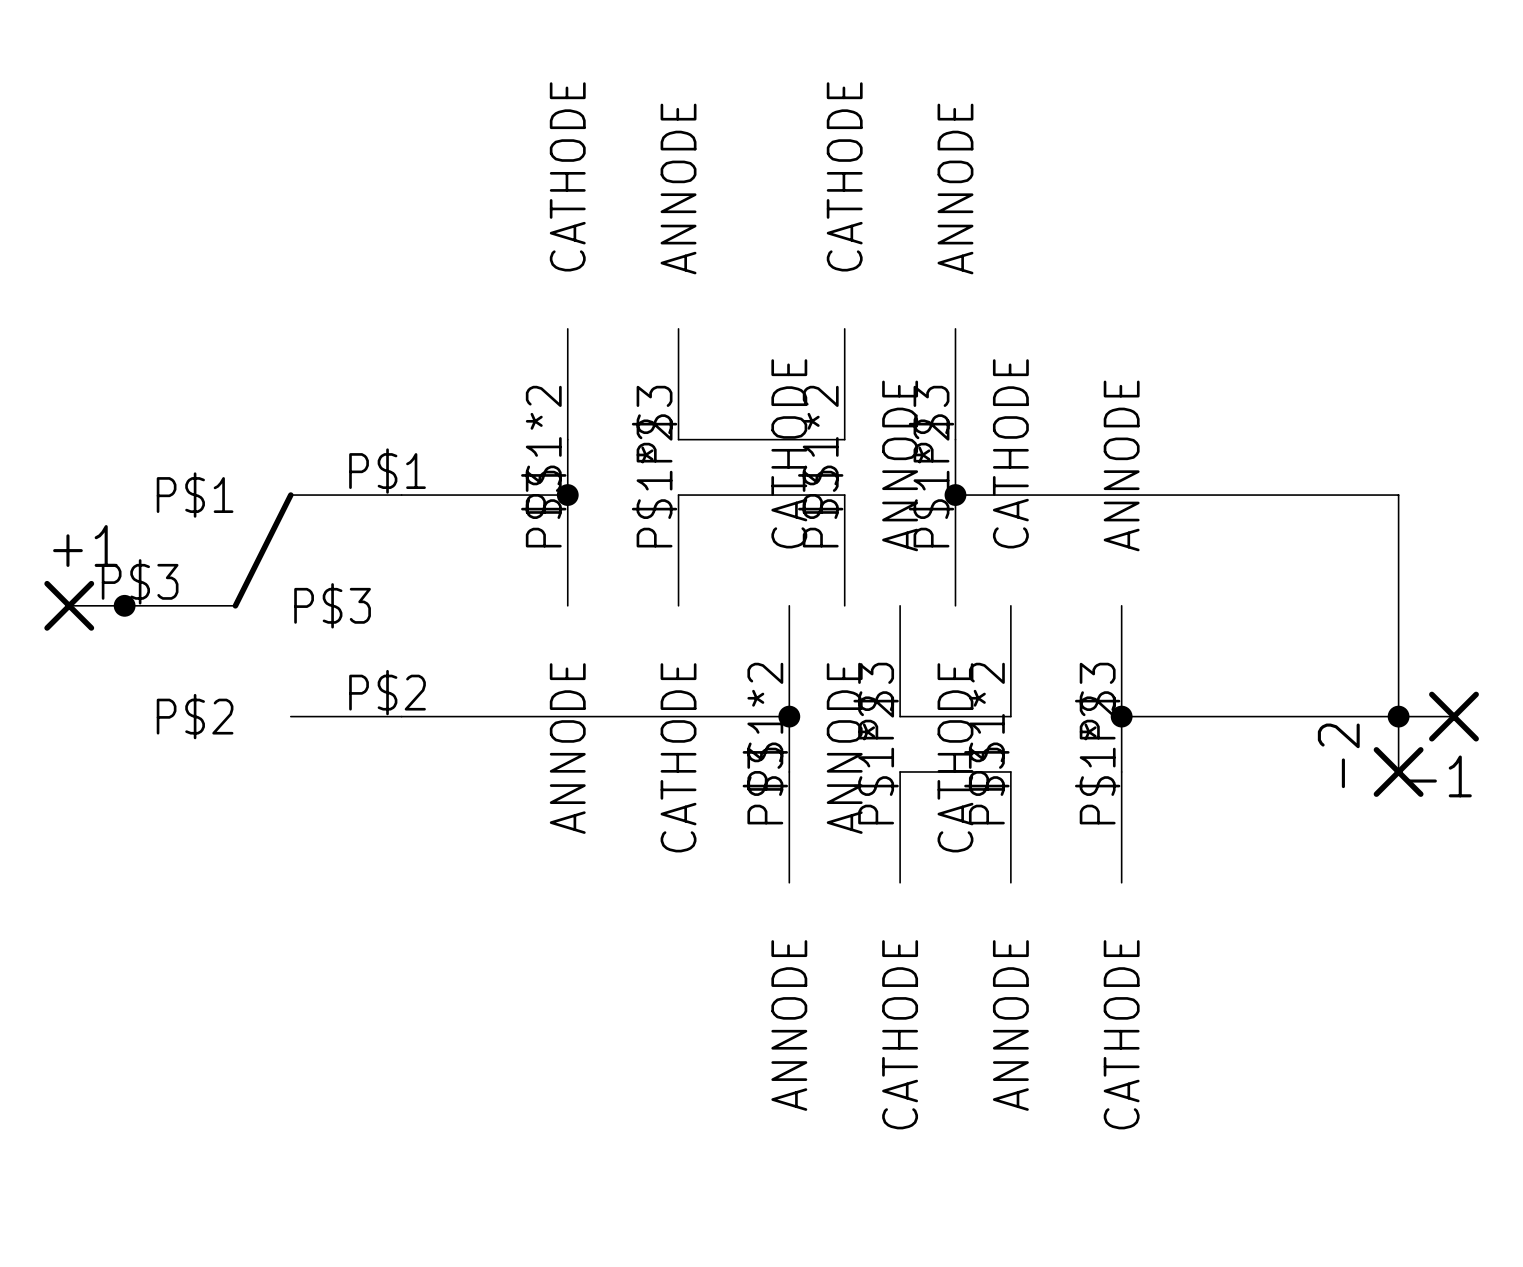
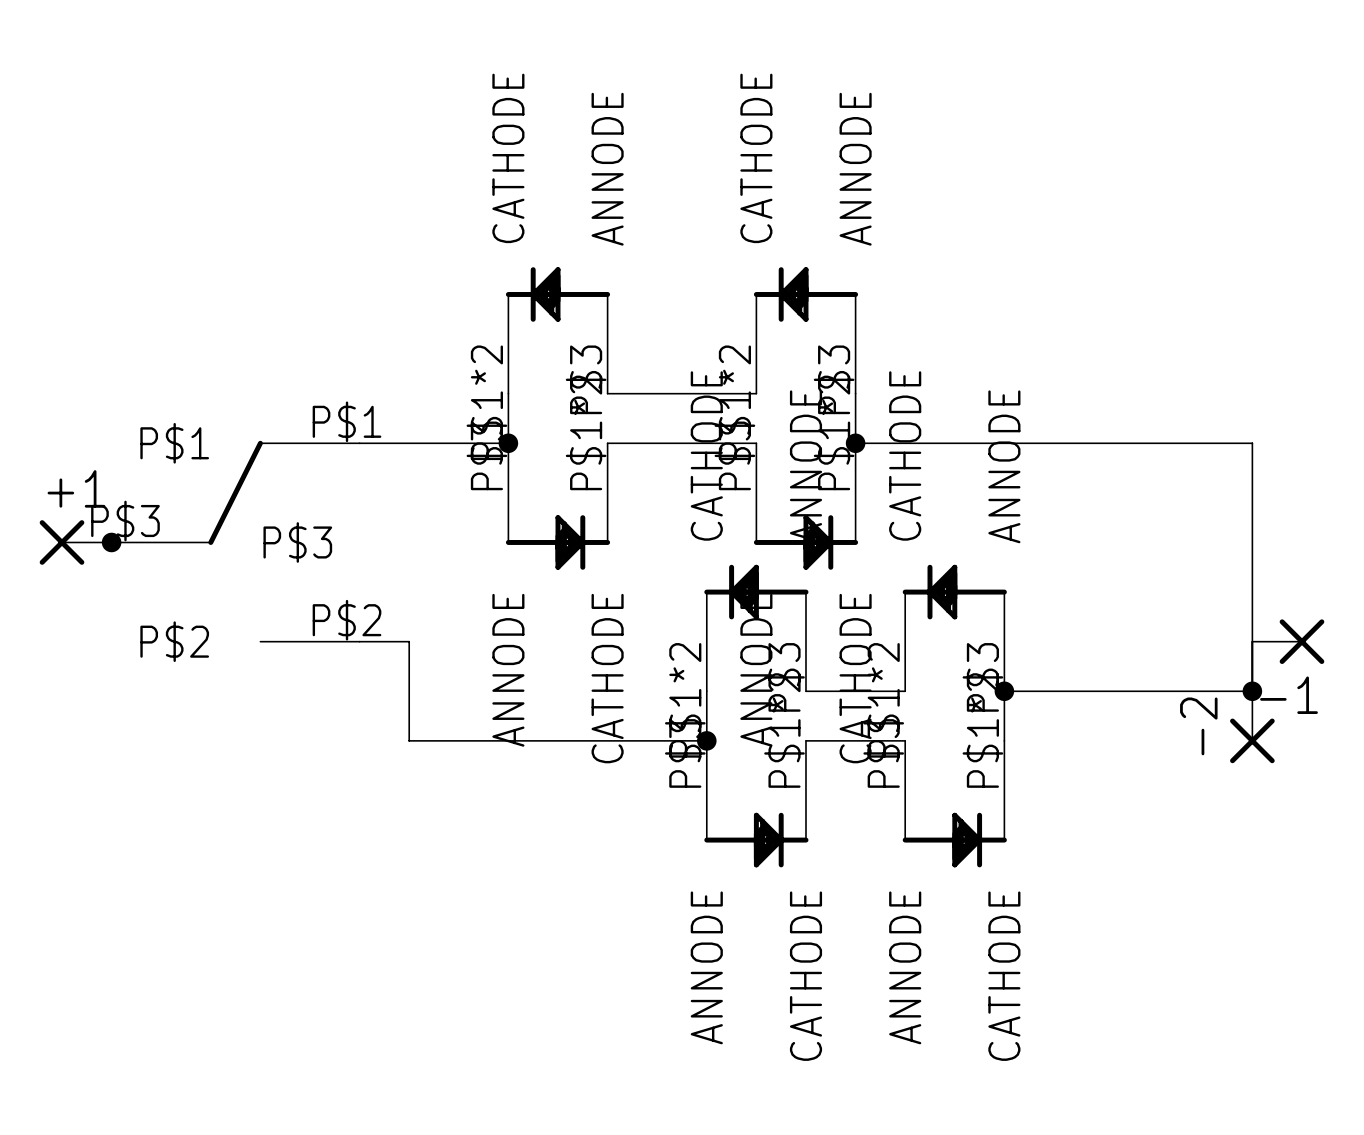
part symbol: [567, 328, 679, 440] -> [505, 267, 611, 394]
part symbol: [844, 328, 956, 440] -> [753, 267, 859, 394]
part symbol: [567, 495, 679, 606] -> [505, 443, 611, 570]
part symbol: [844, 495, 956, 606] -> [753, 443, 859, 570]
part: (844, 661) -> none
part: (1066, 661) -> none
part: none -> (756, 628)
part: none -> (954, 628)
wire: (456, 716) (789, 716) (789, 771) -> (409, 641) (409, 740) (706, 740) (706, 691)
junction position: (789, 716) -> (706, 740)
wire: (900, 716) (1010, 716) -> (805, 740) (905, 740)
junction position: (1121, 716) -> (1004, 691)
wire: (1398, 716) (1121, 716) (1121, 771) -> (1252, 641) (1252, 691) (1004, 691) (1004, 740)
junction position: (1398, 716) -> (1252, 691)
-2 position: (1398, 756) -> (1252, 727)
part: (844, 827) -> none
part: (1066, 827) -> none
part: none -> (756, 804)
part: none -> (954, 804)

